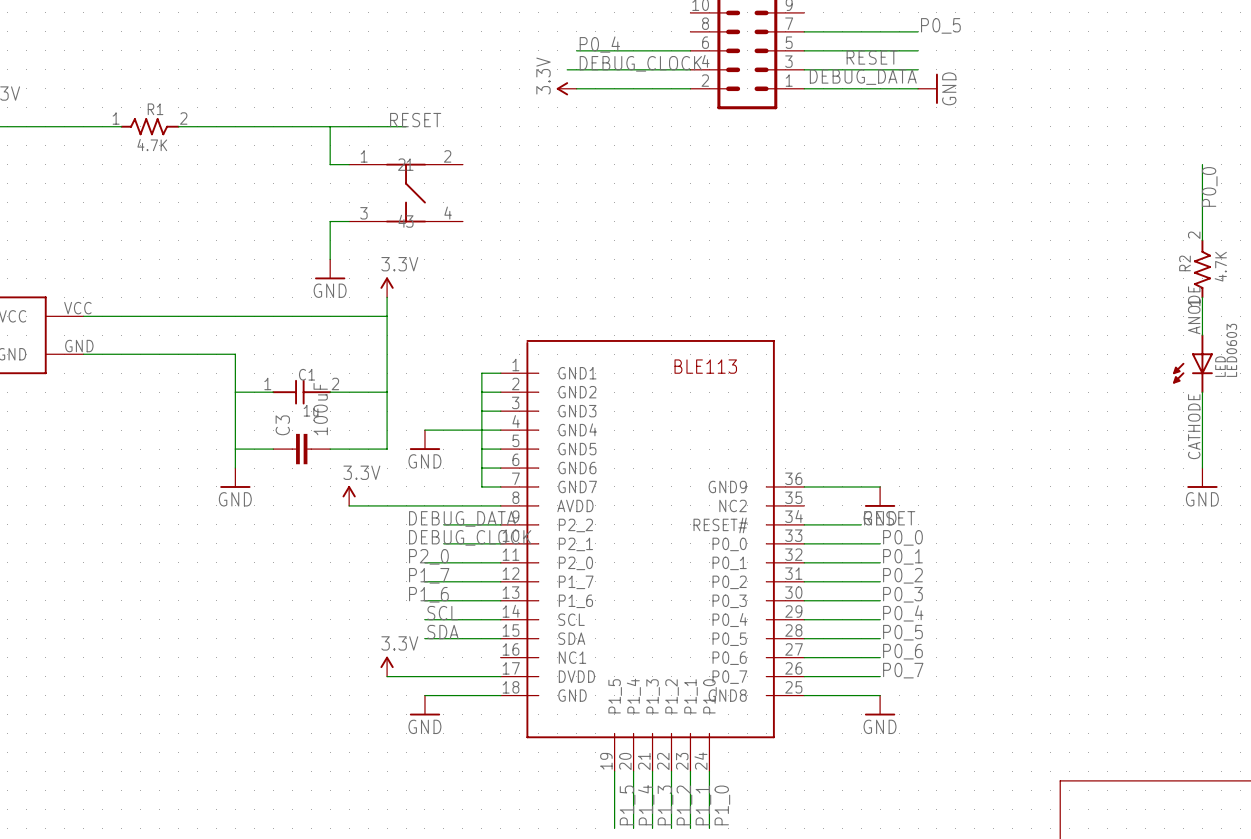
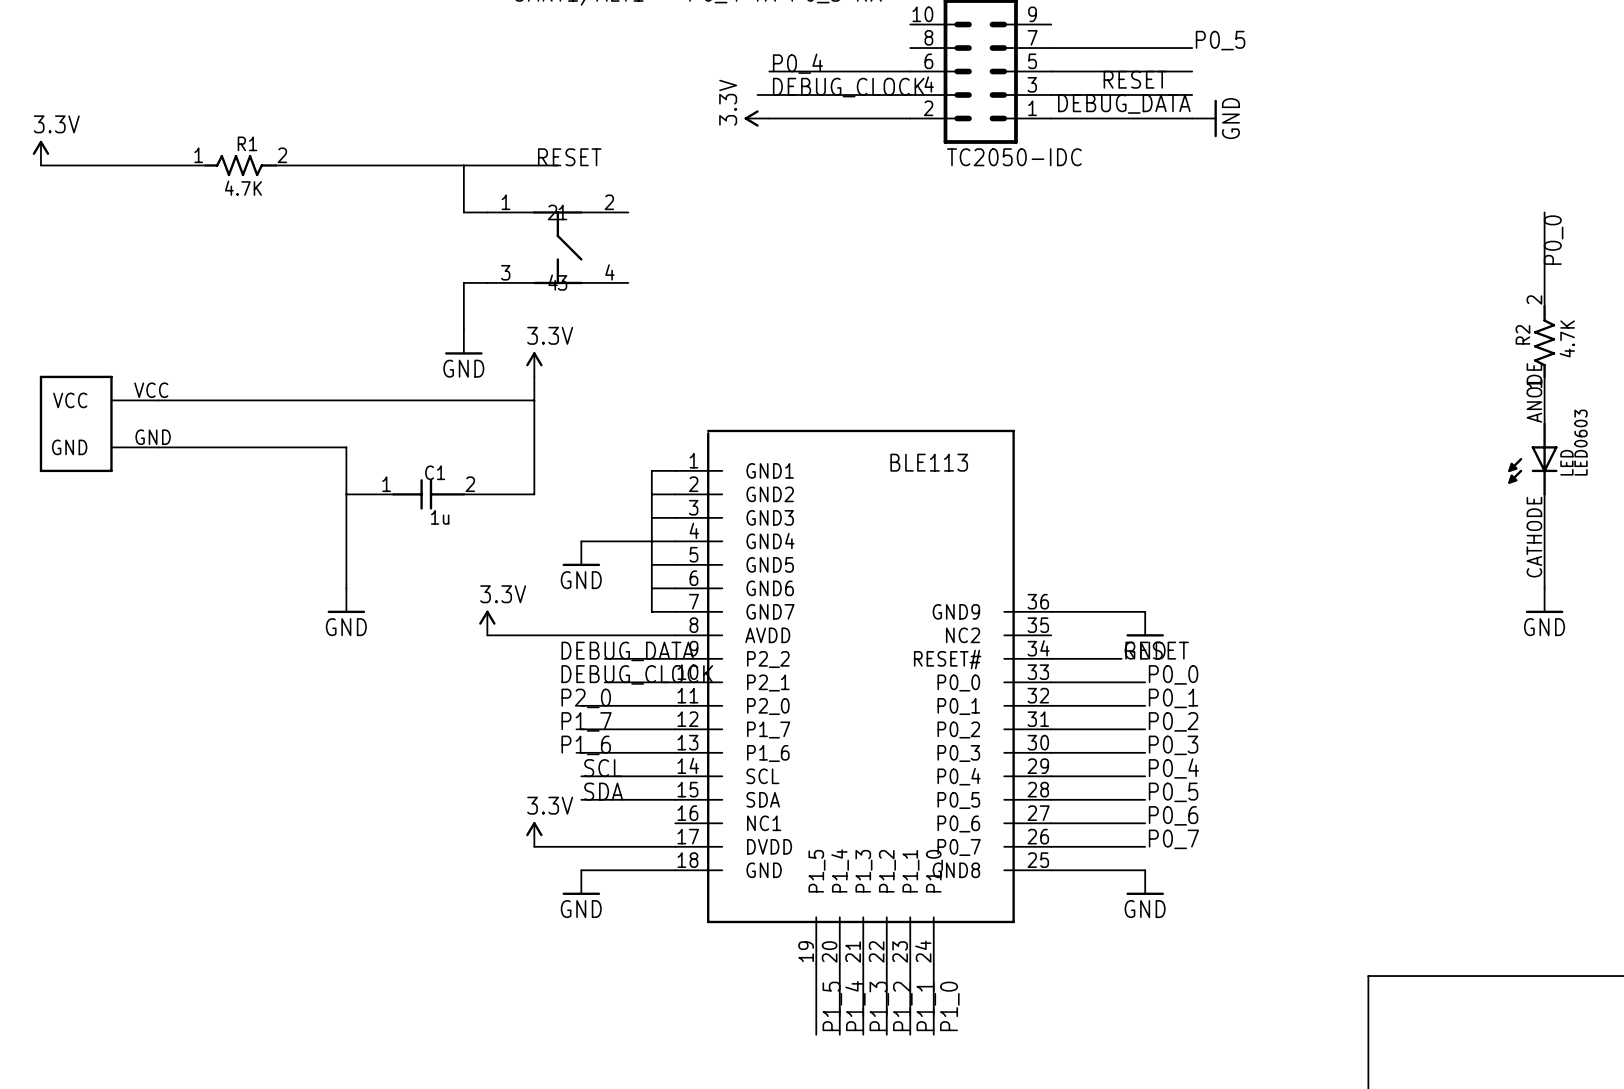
part value: none -> TC2050-IDC (1014, 157)
wire: (387, 392) (387, 449) (330, 449) -> none
wire: (235, 449) (273, 449) -> none
C3: 100uF (301, 449) -> none

